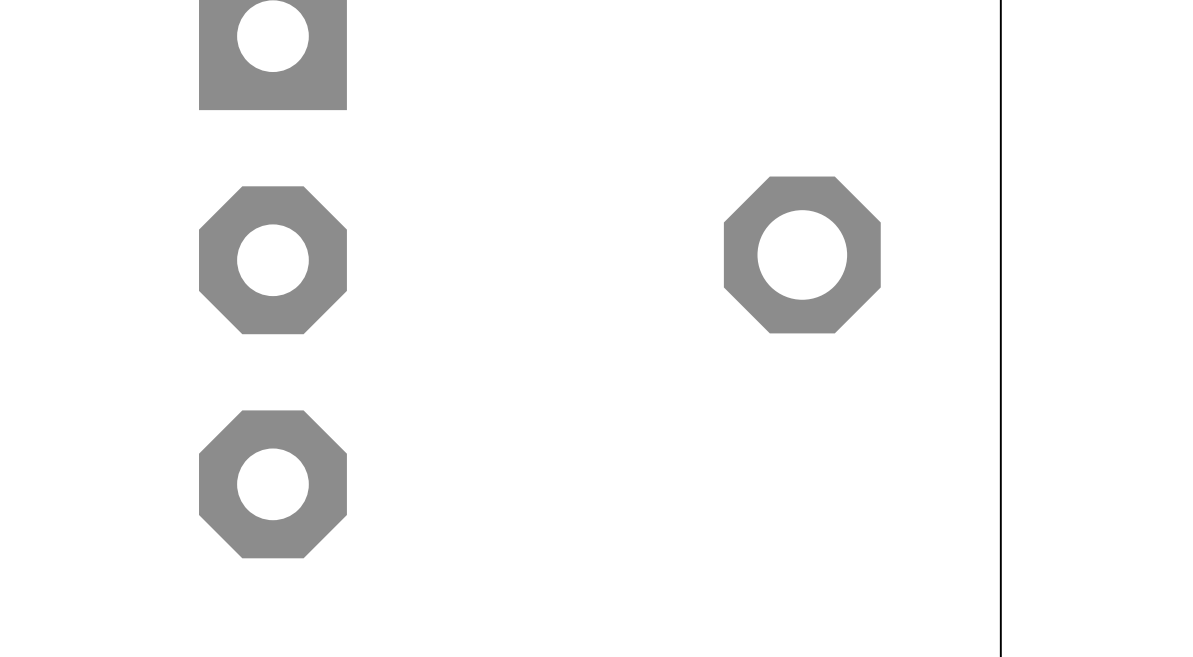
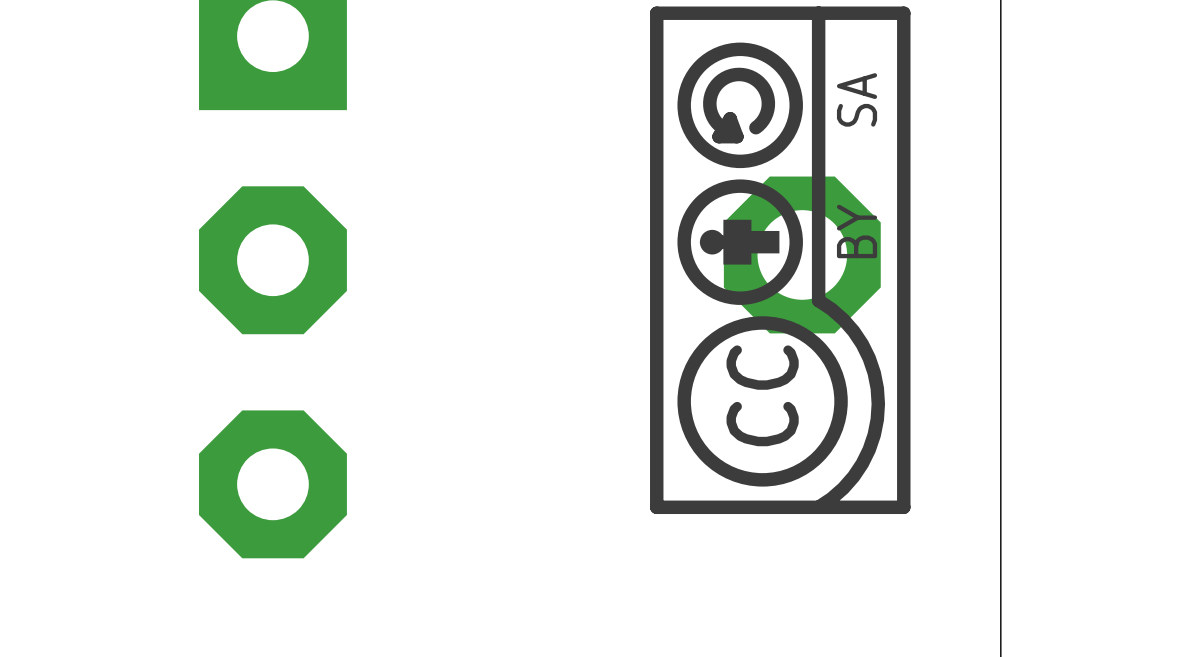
drawing: none -> [650, 6, 911, 515]

